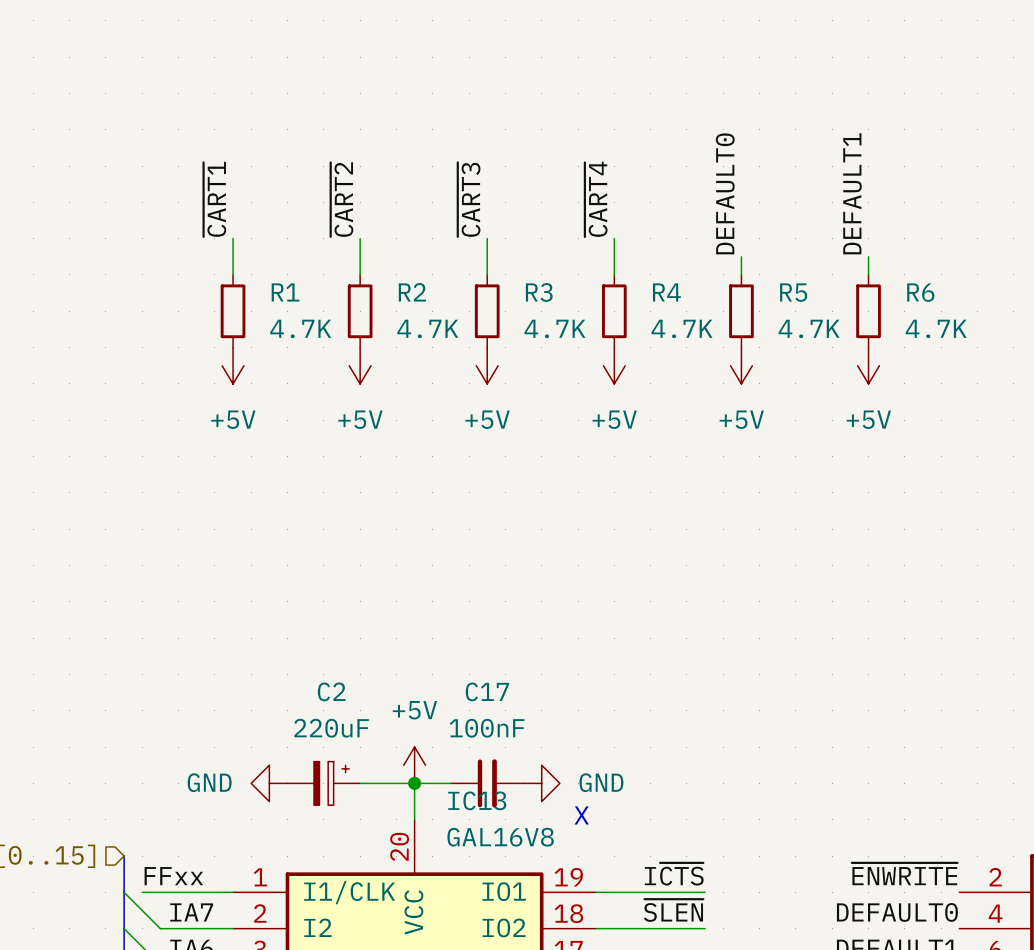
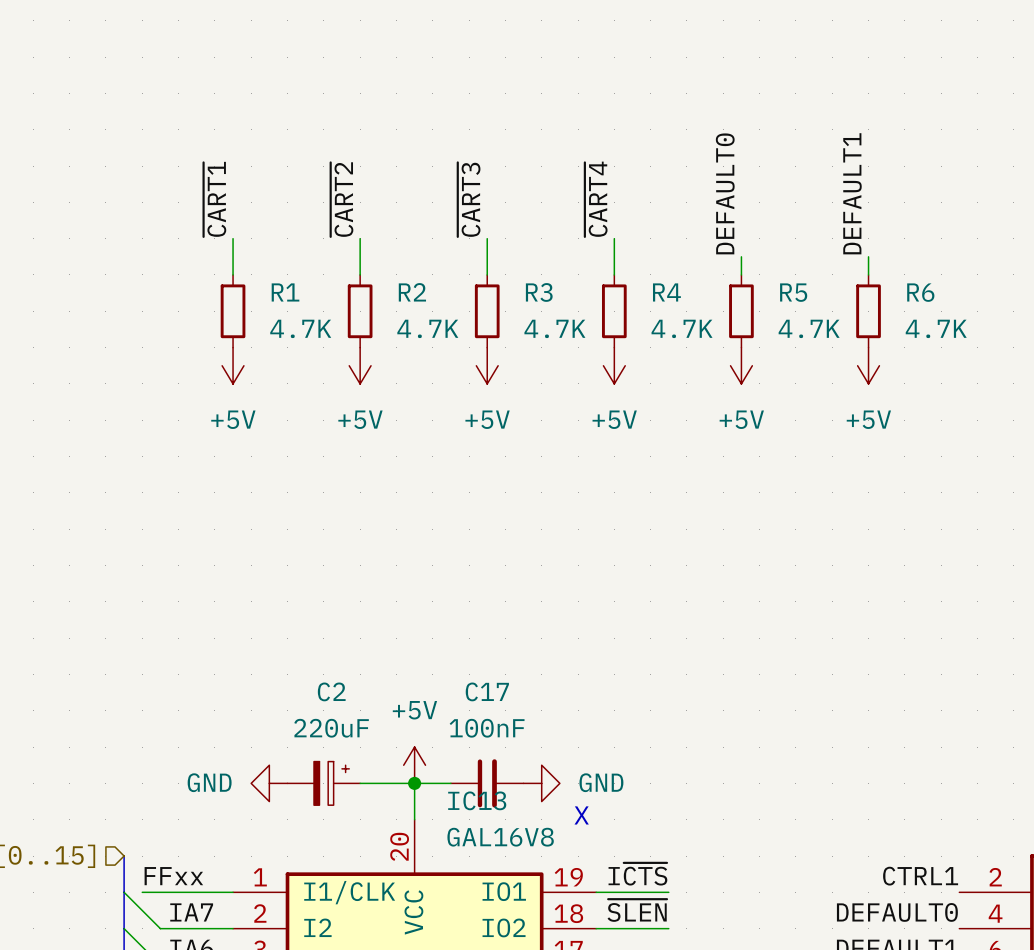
label position: I~{CTS} (674, 874) -> I~{CTS} (637, 874)
label: ~{ENWRITE} (904, 874) -> CTRL1 (920, 876)
wire: (668, 892) (705, 892) -> none
label position: ~{SLEN} (673, 910) -> ~{SLEN} (637, 910)
wire: (668, 928) (705, 928) -> none

